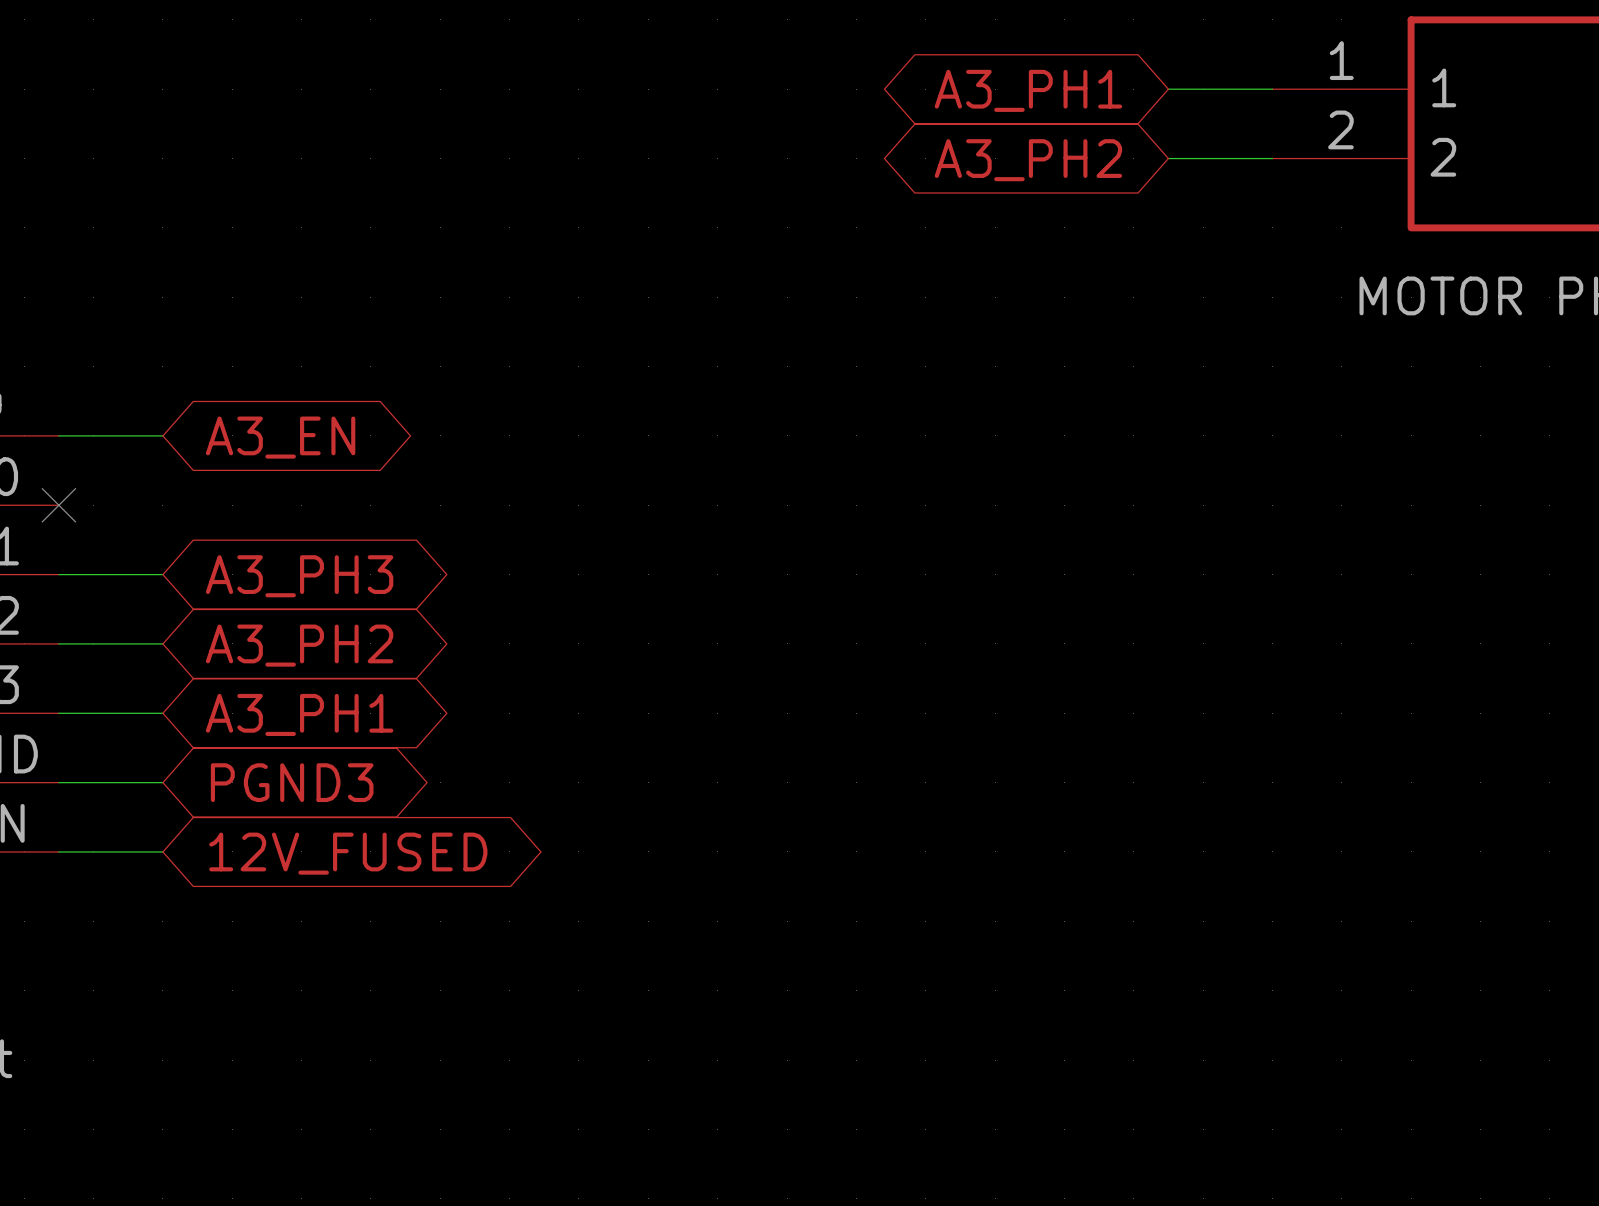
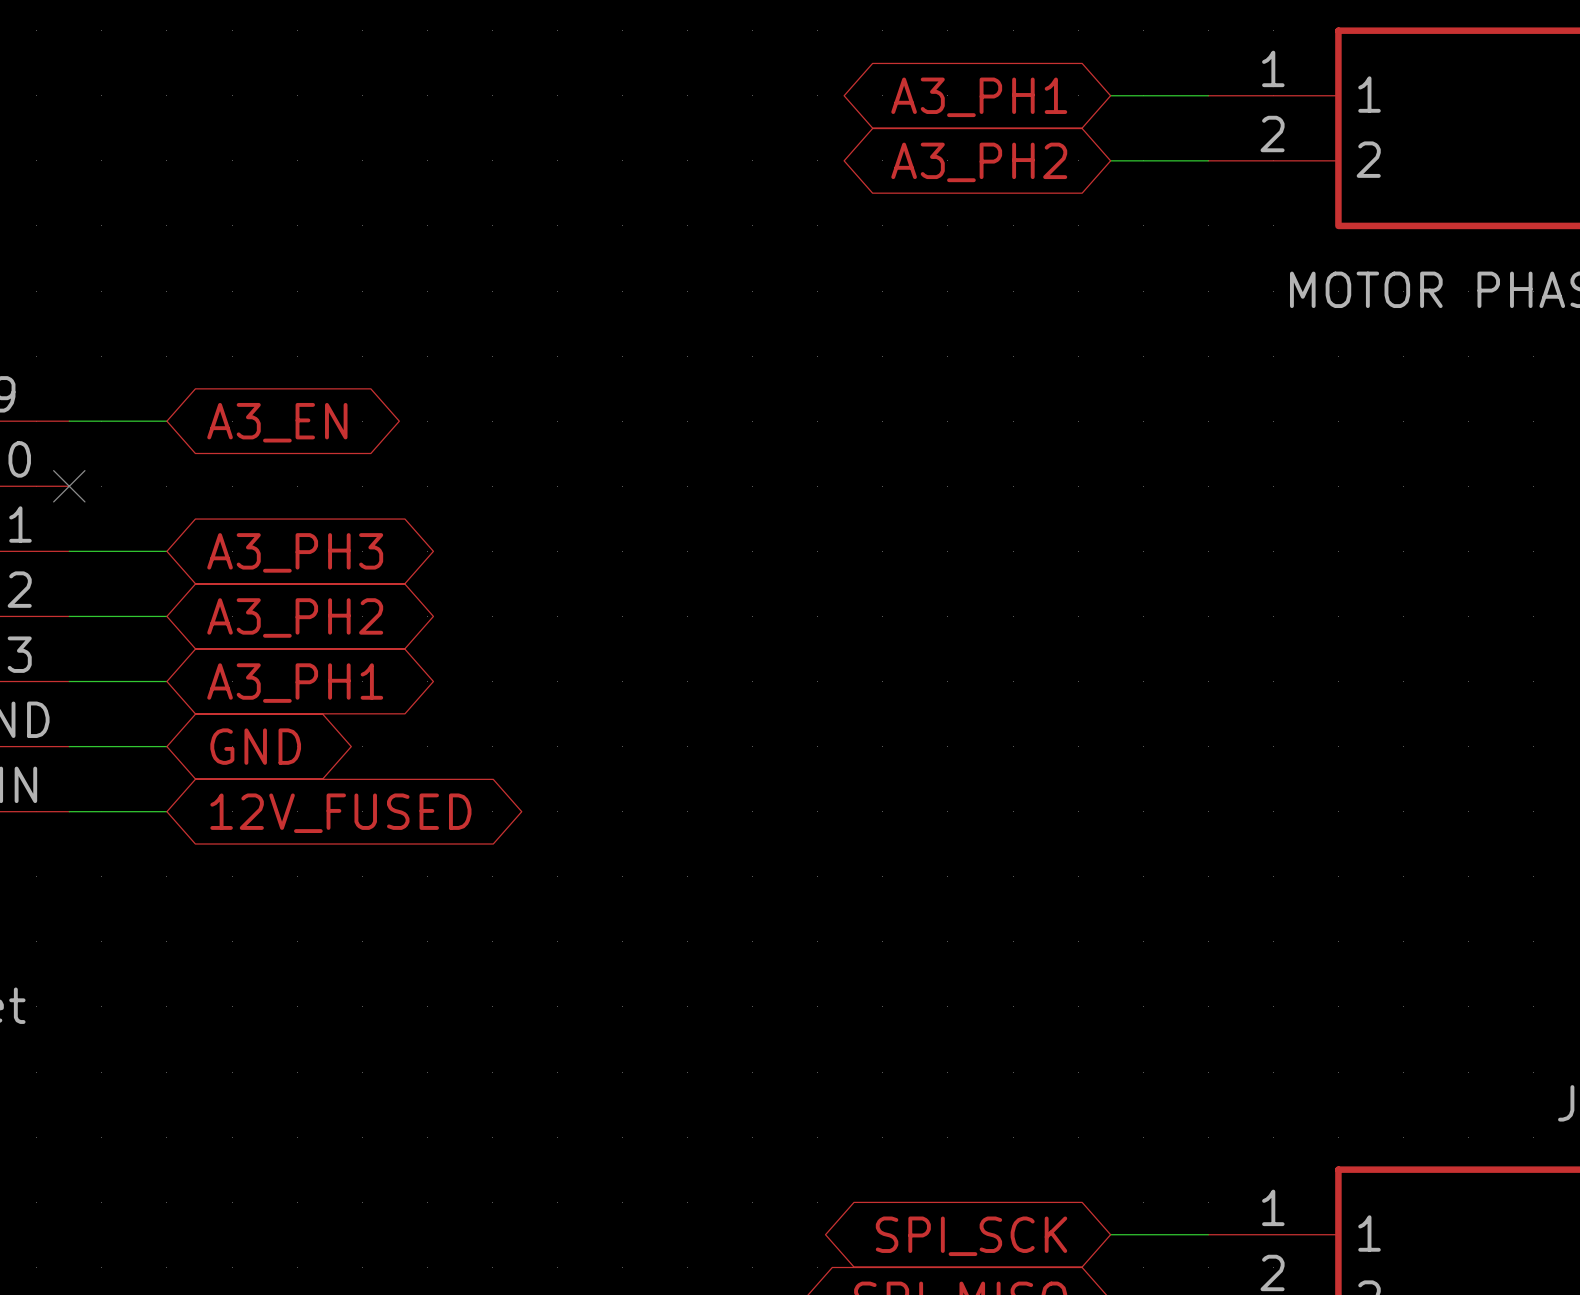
global label: PGND3 (292, 782) -> GND (255, 746)

